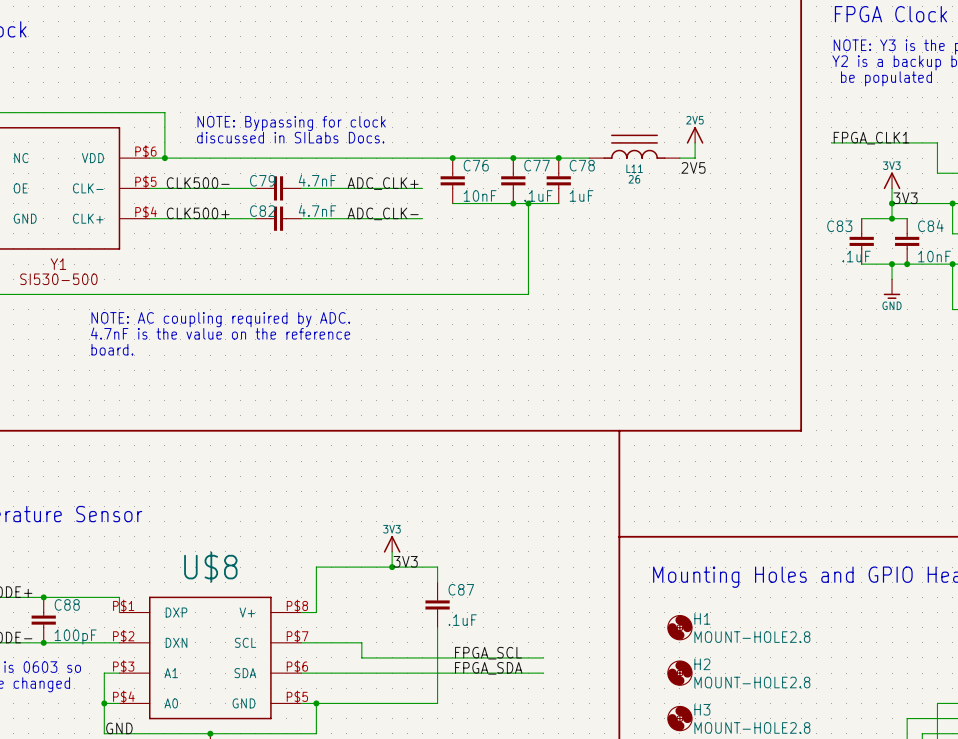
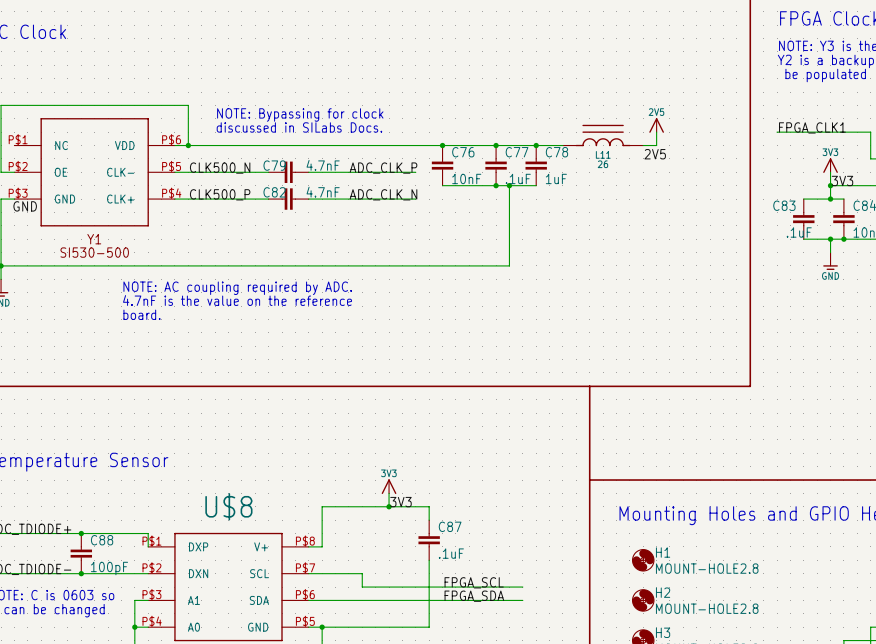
label: CLK500- (198, 183) -> CLK500_N (220, 168)
label: ADC_CLK+ (383, 183) -> ADC_CLK_P (383, 168)
label: CLK500+ (198, 213) -> CLK500_P (220, 194)
label: ADC_CLK- (383, 213) -> ADC_CLK_N (383, 194)

